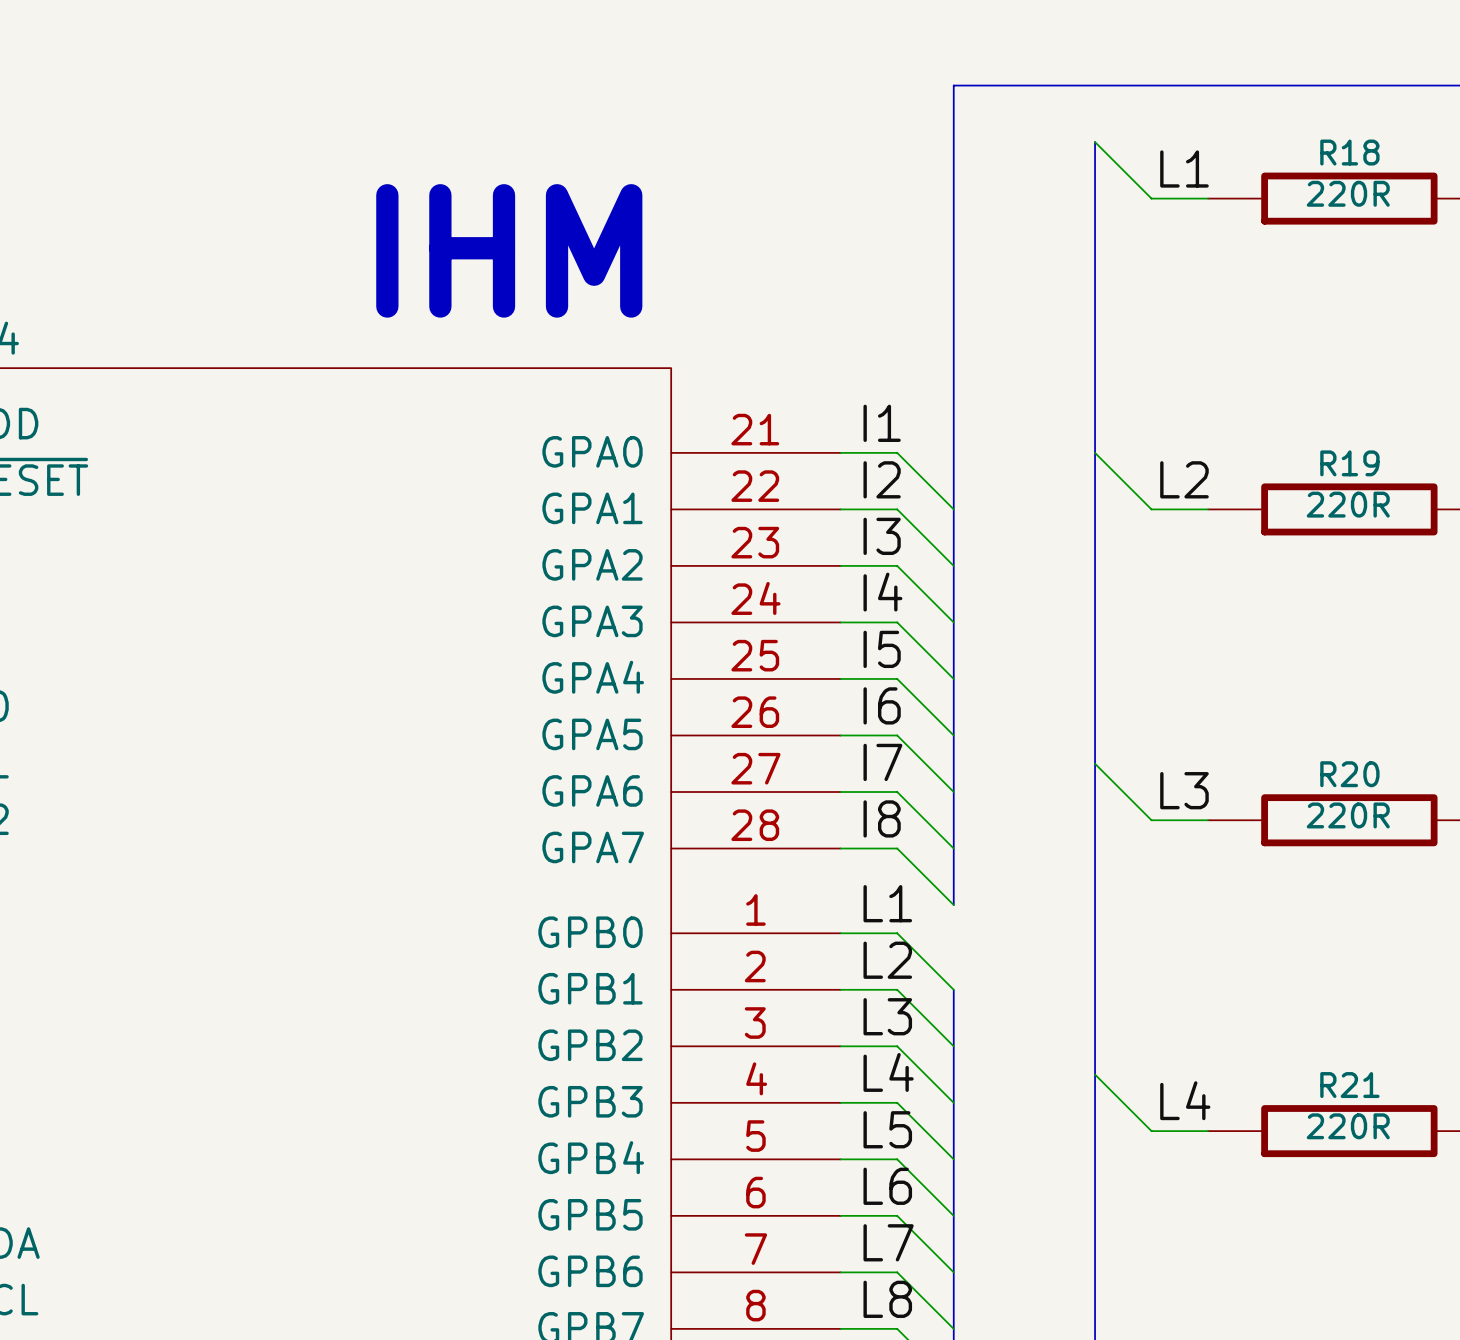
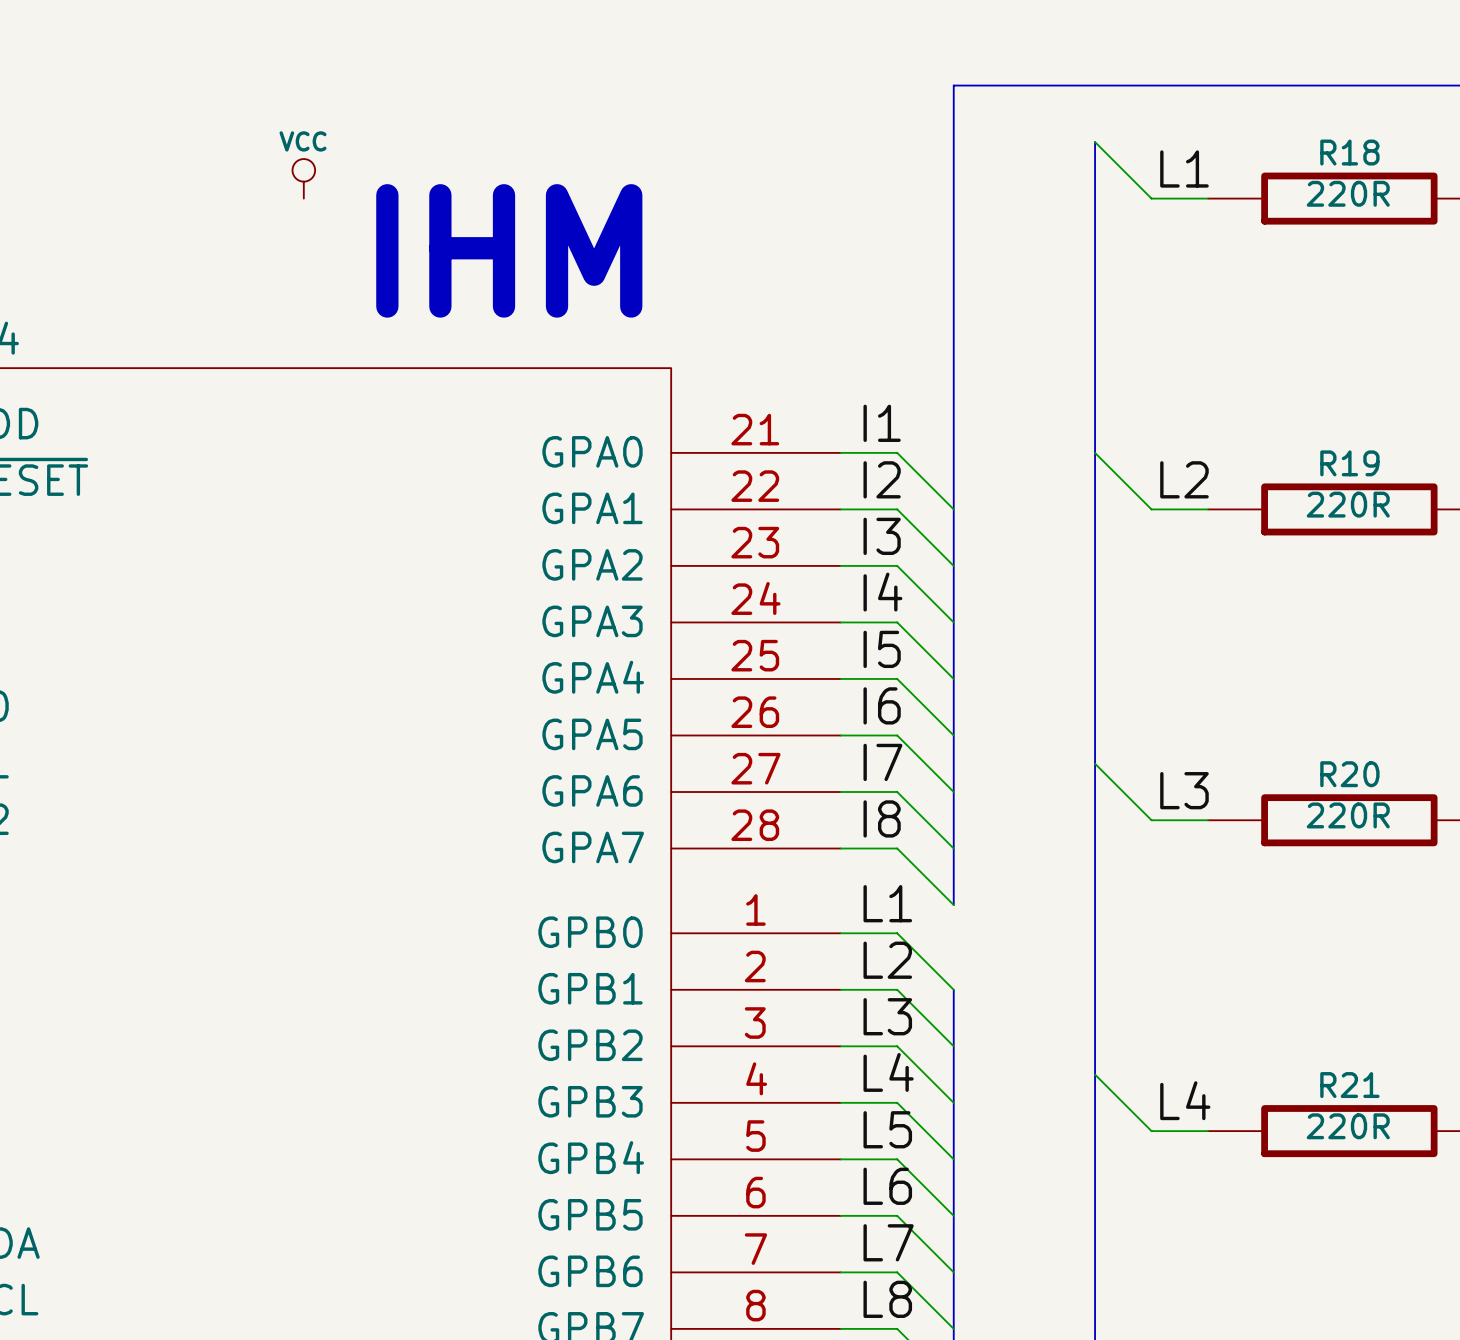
power symbol: none -> VCC (303, 178)

